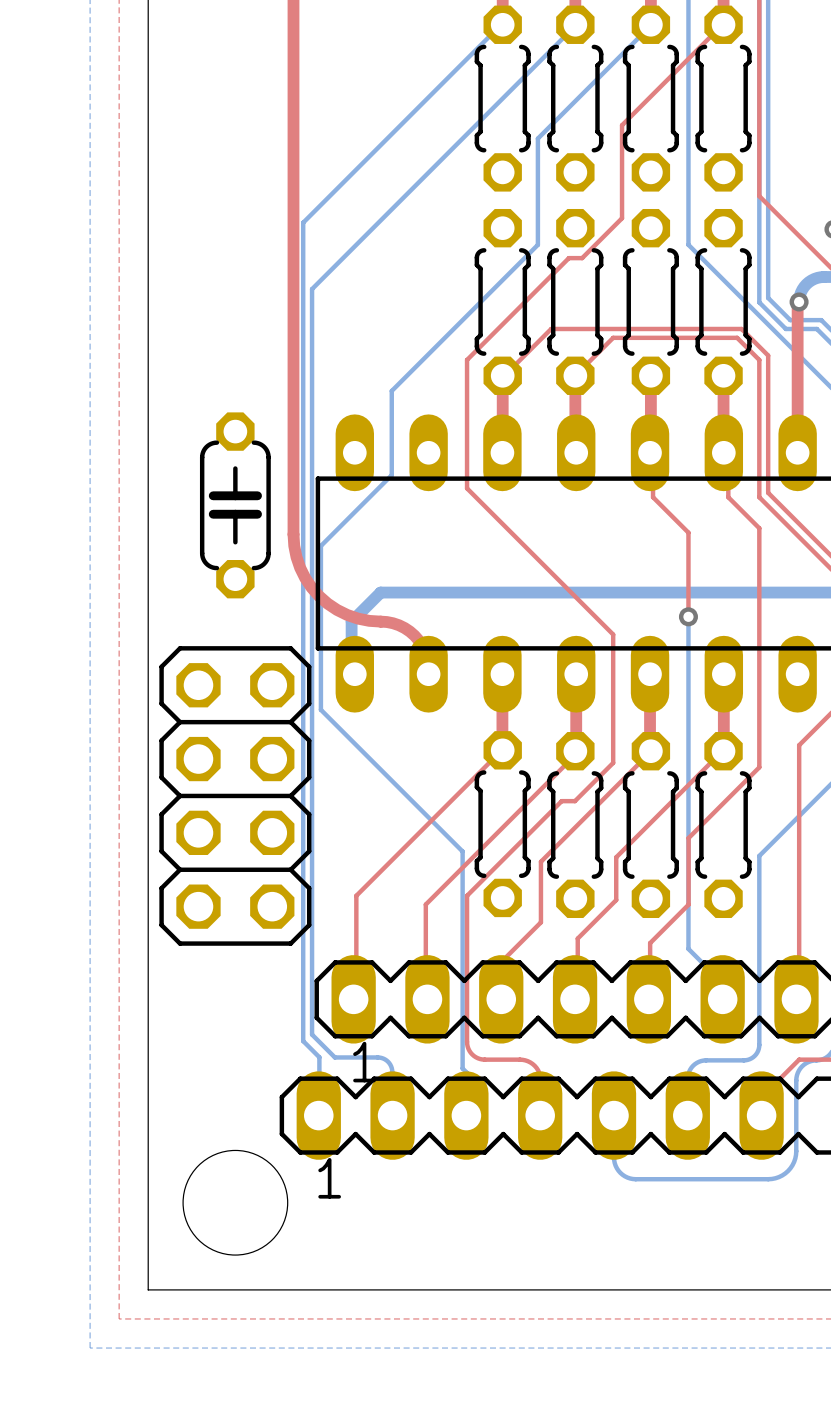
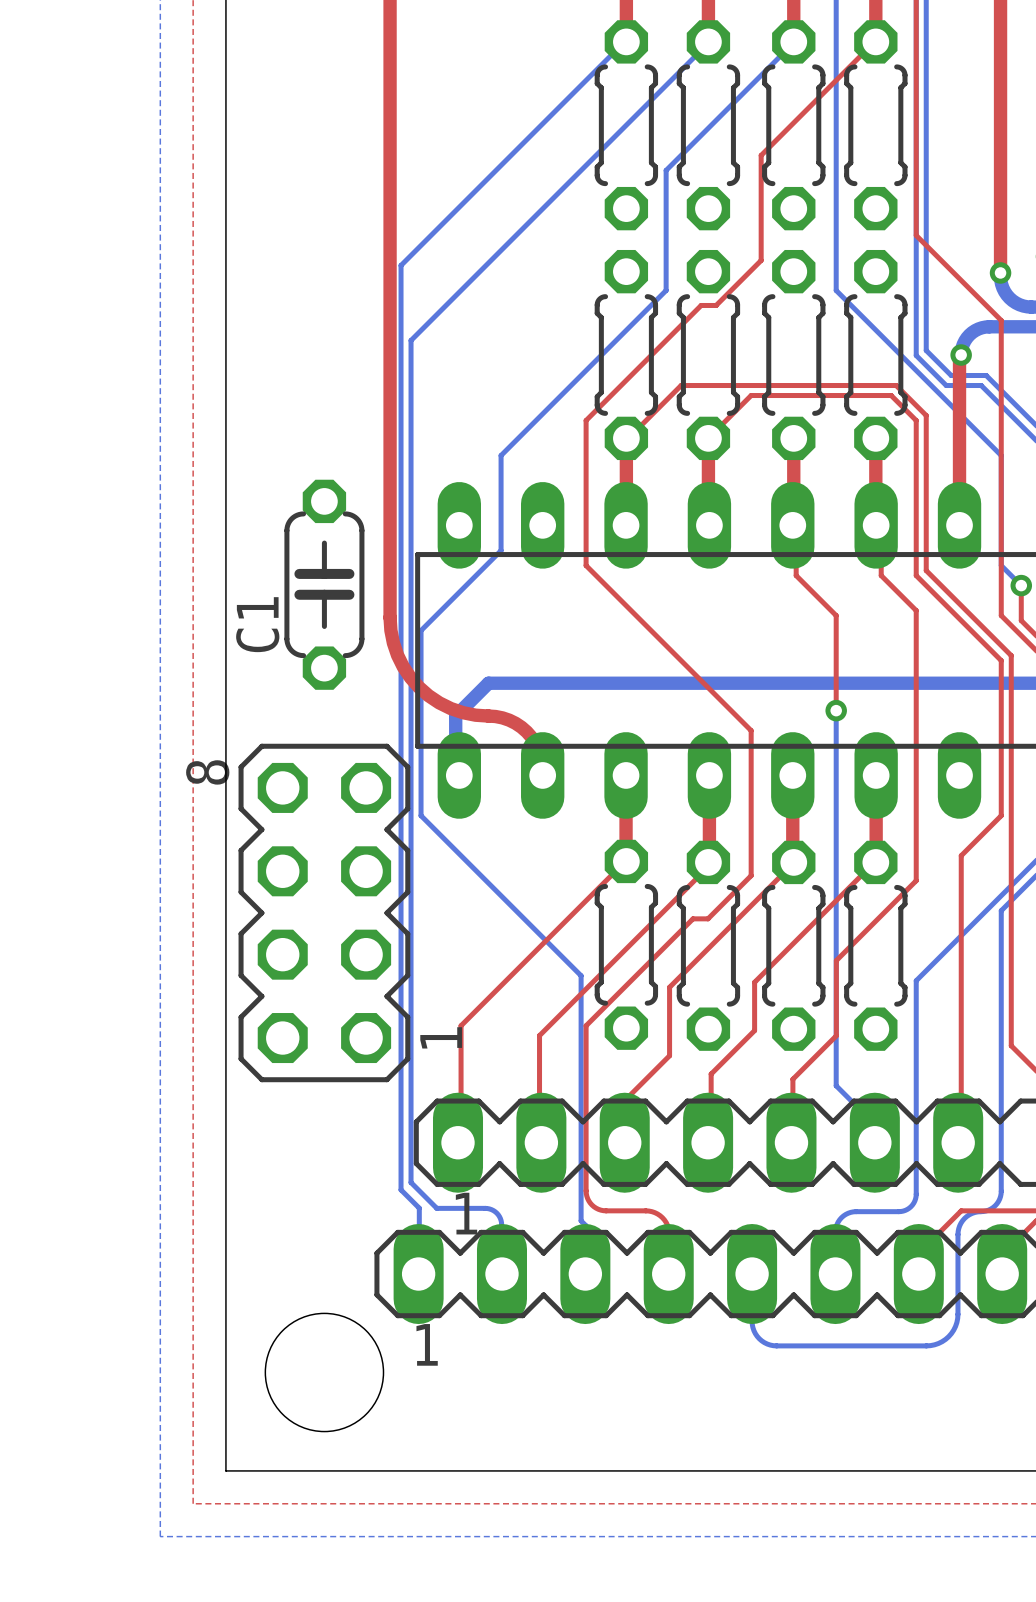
C1 name: none -> C1 (257, 624)
part footprint: [159, 646, 312, 946] -> [238, 743, 411, 1083]

